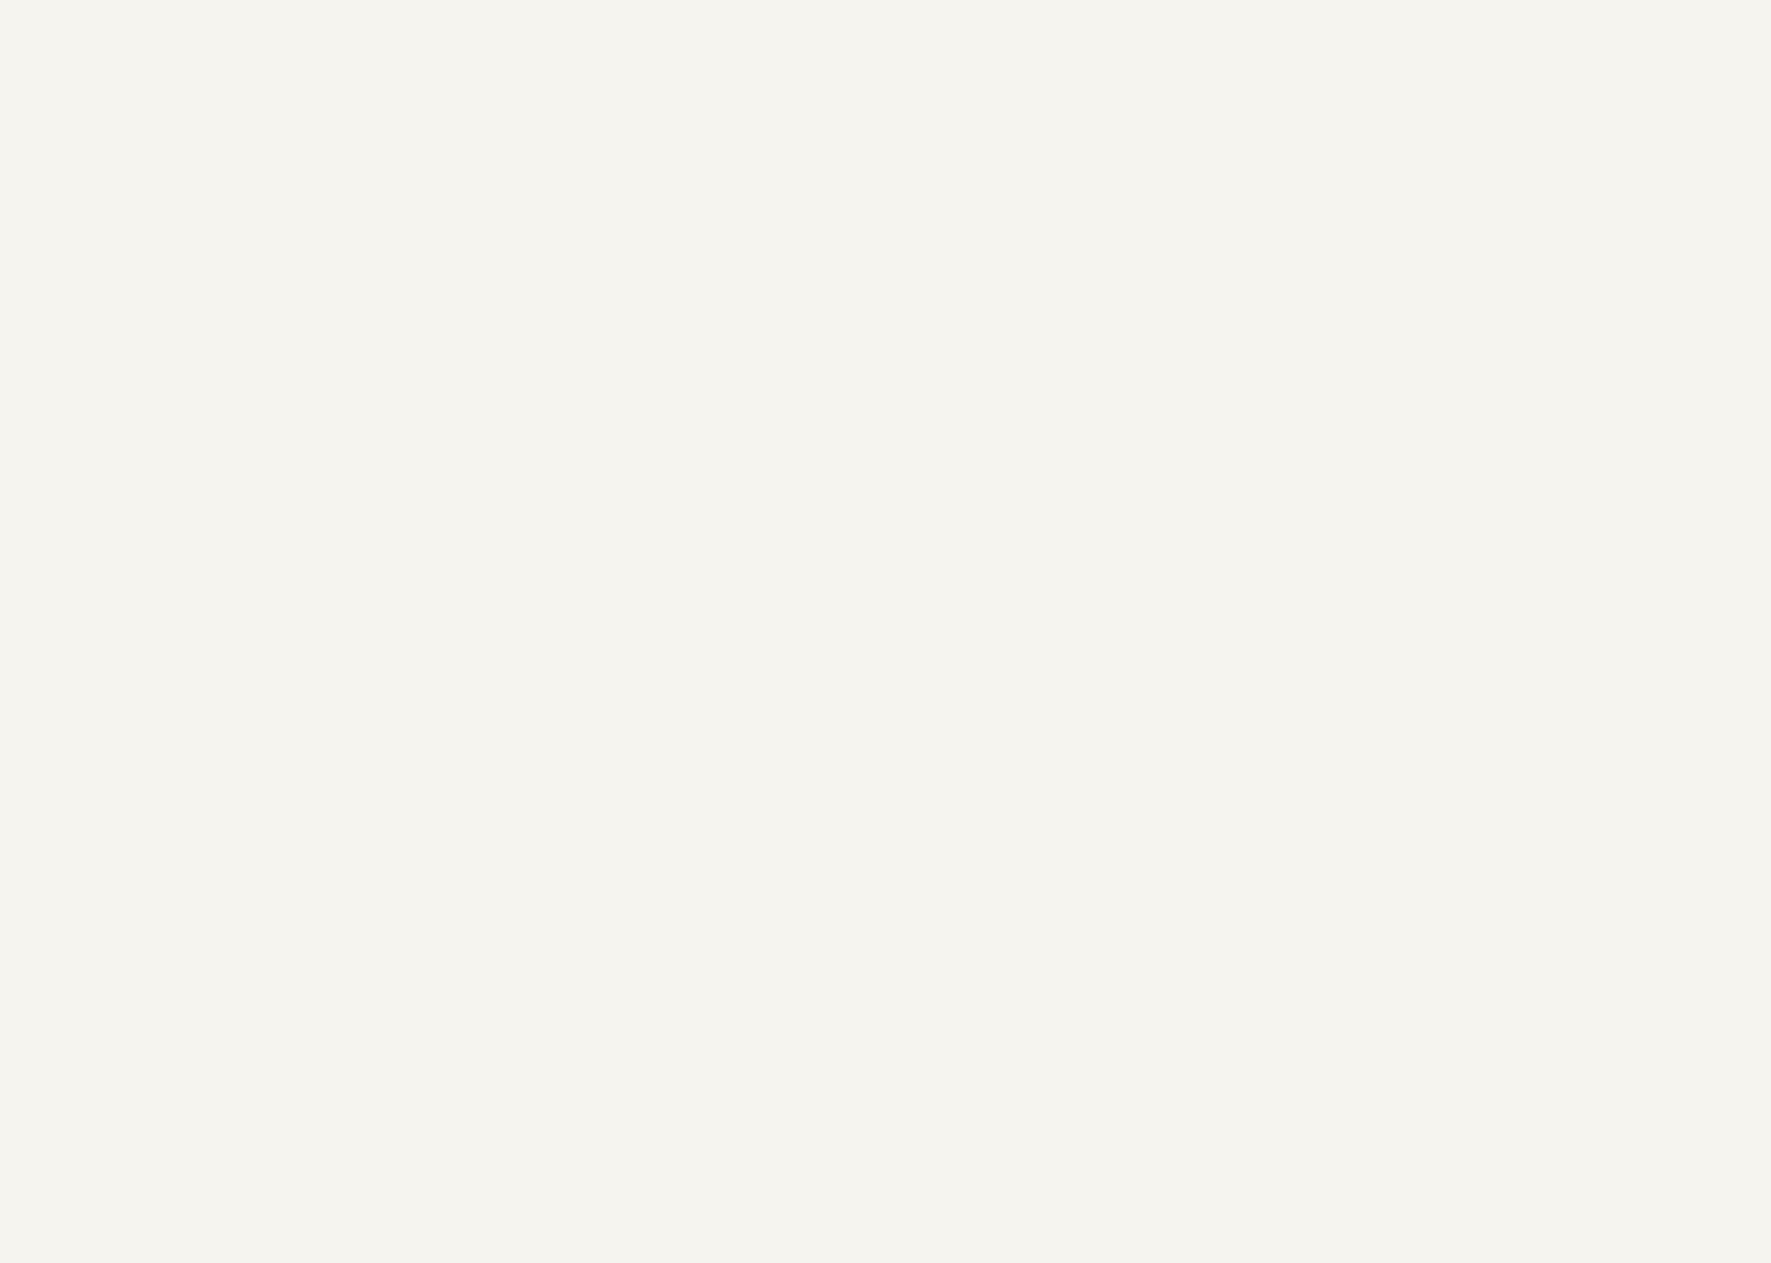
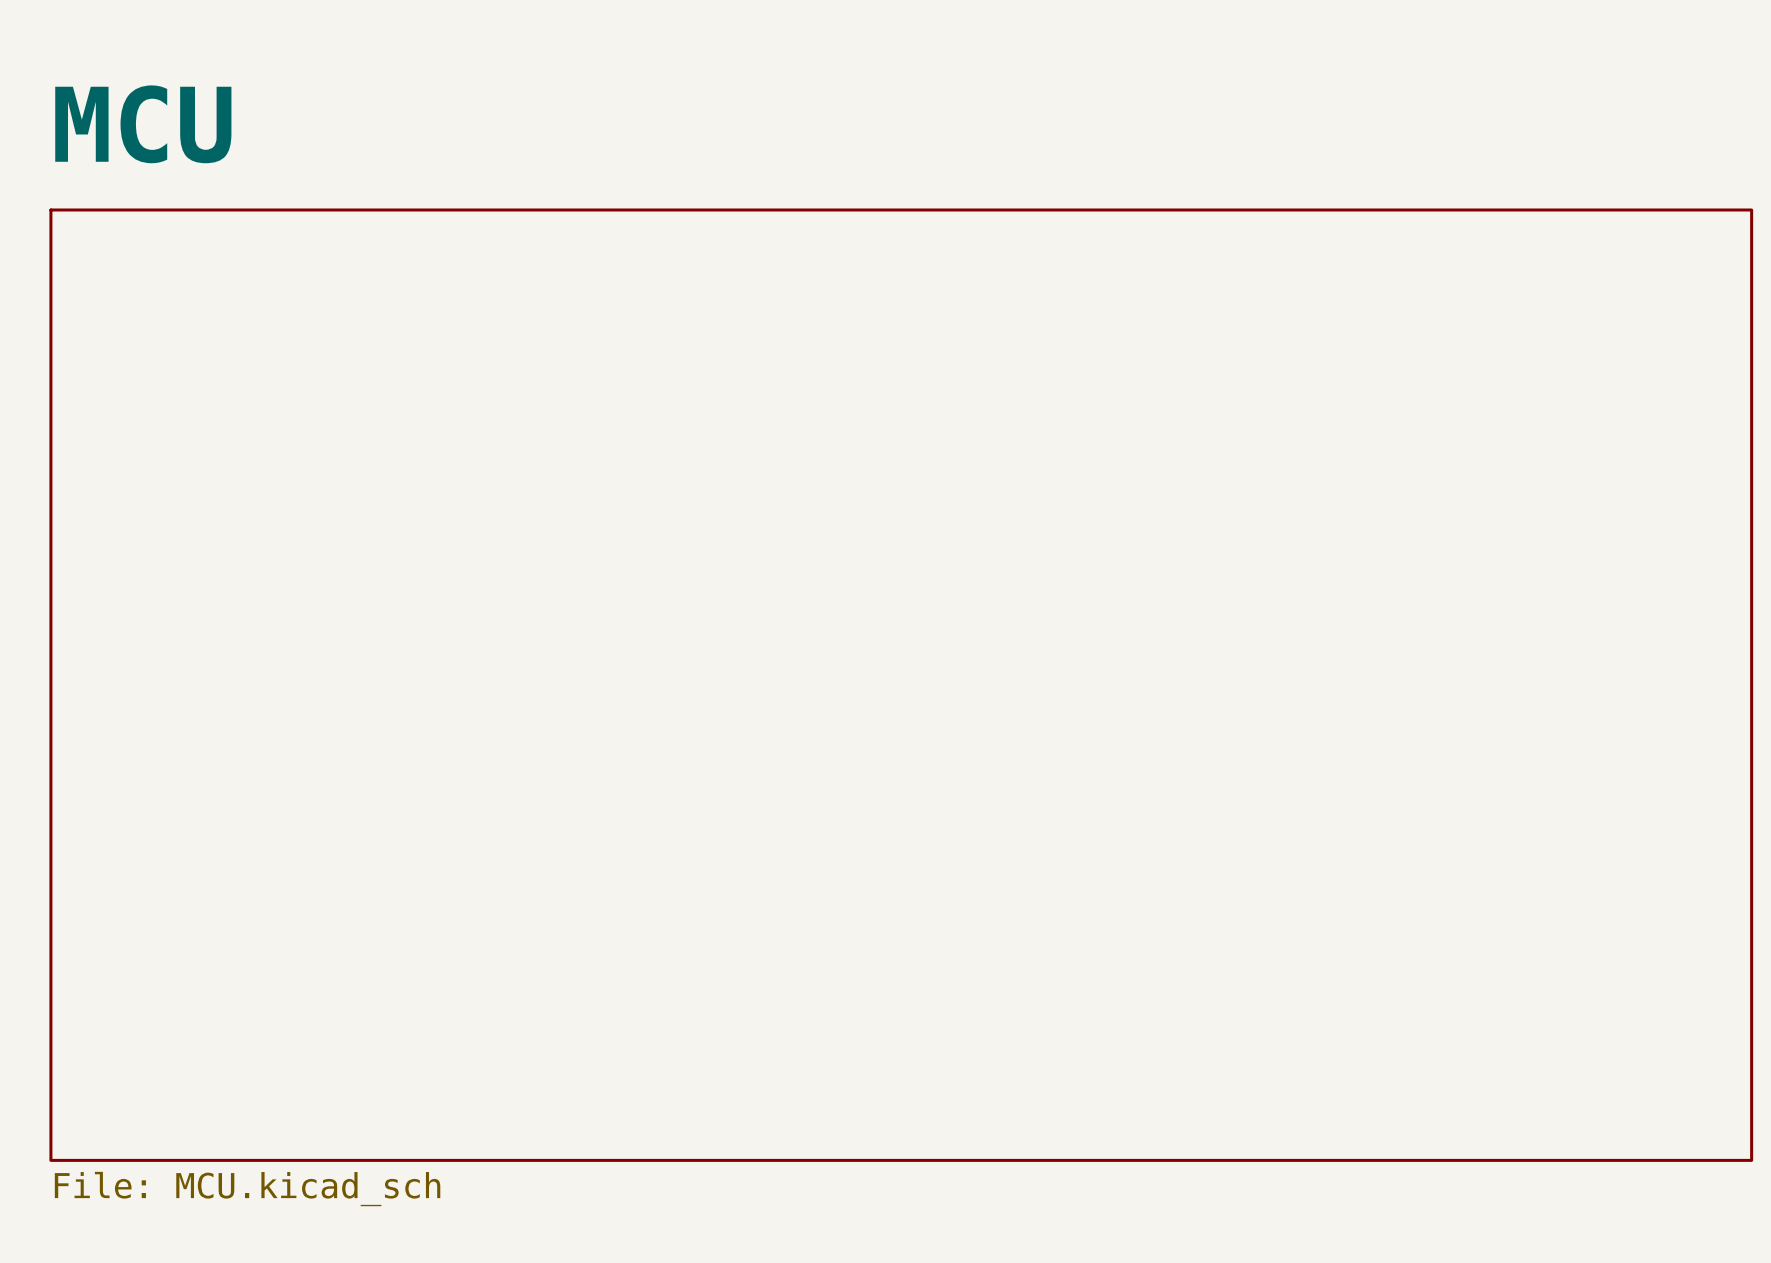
sheet MCU: none -> File: MCU.kicad_sch (901, 685)

